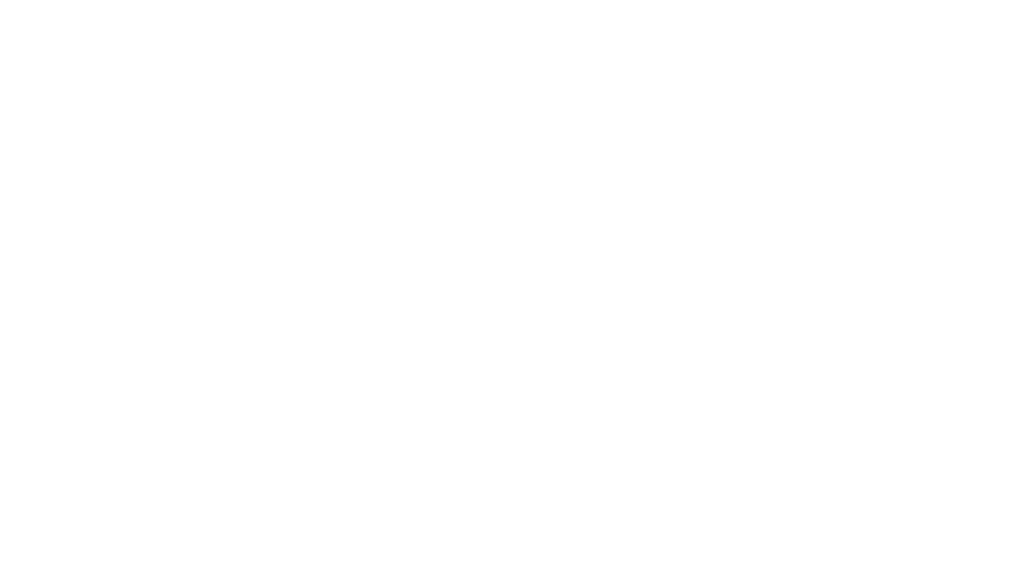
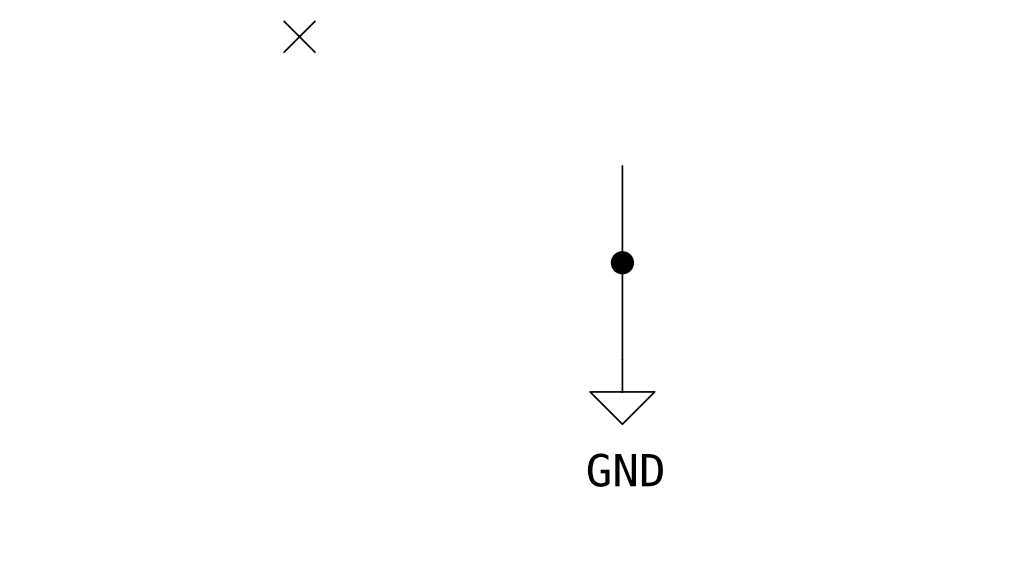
no-connect mark: none -> (299, 36)
wire: none -> (622, 165) (622, 359)
junction: none -> (622, 262)
power symbol: none -> GND (622, 391)

